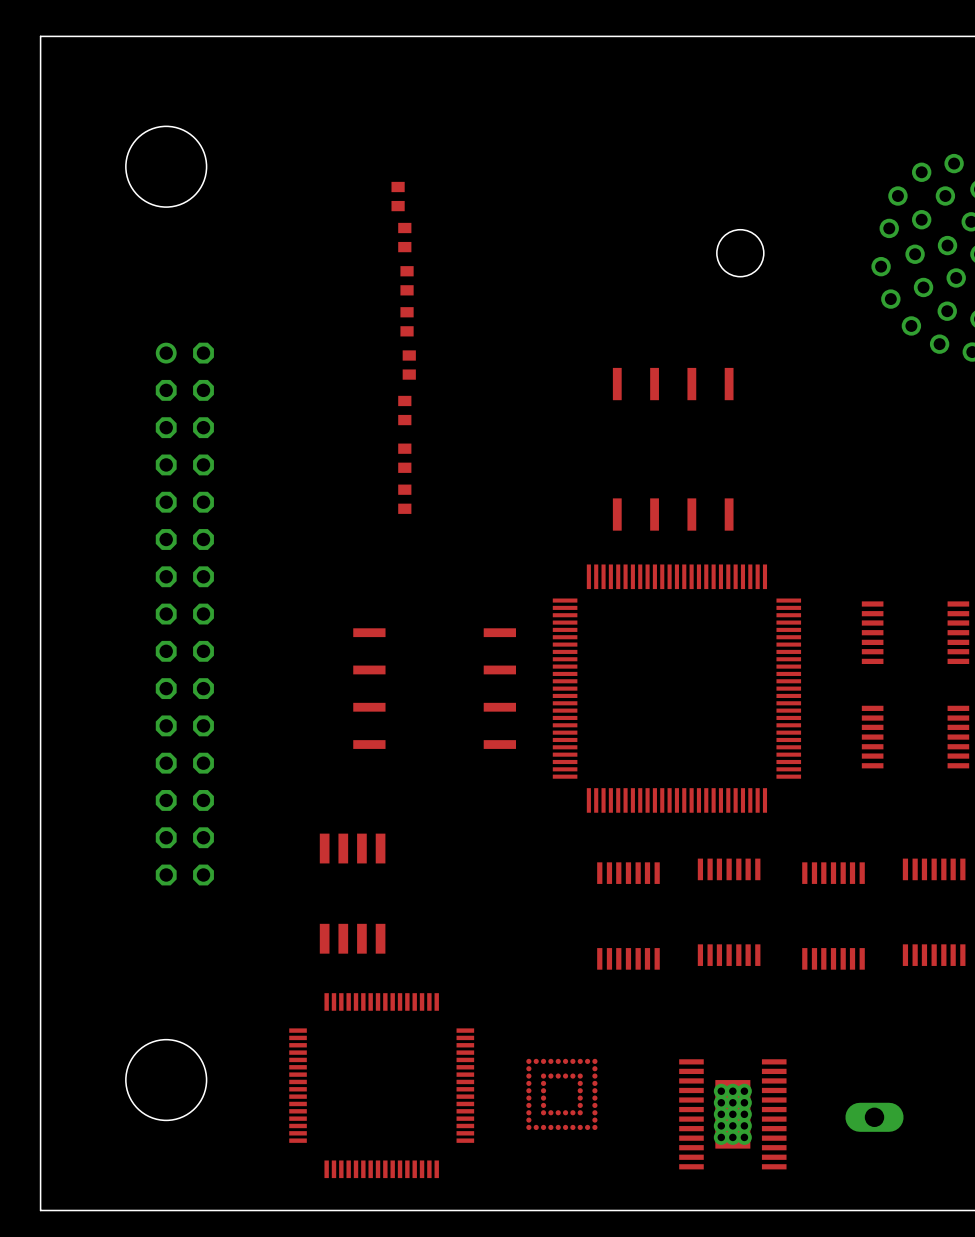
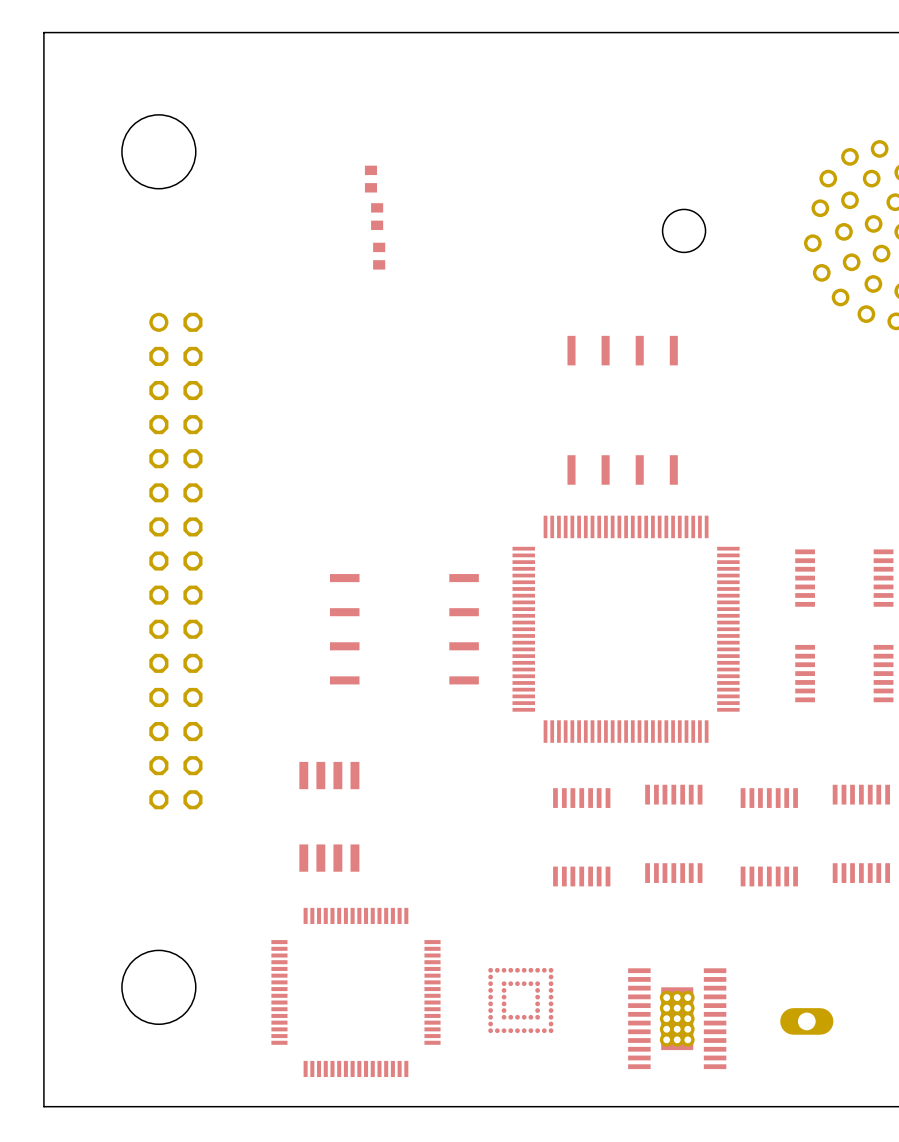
part: (407, 321) -> none
part: (409, 365) -> none
part: (404, 410) -> none
part: (404, 458) -> none
part: (404, 499) -> none

